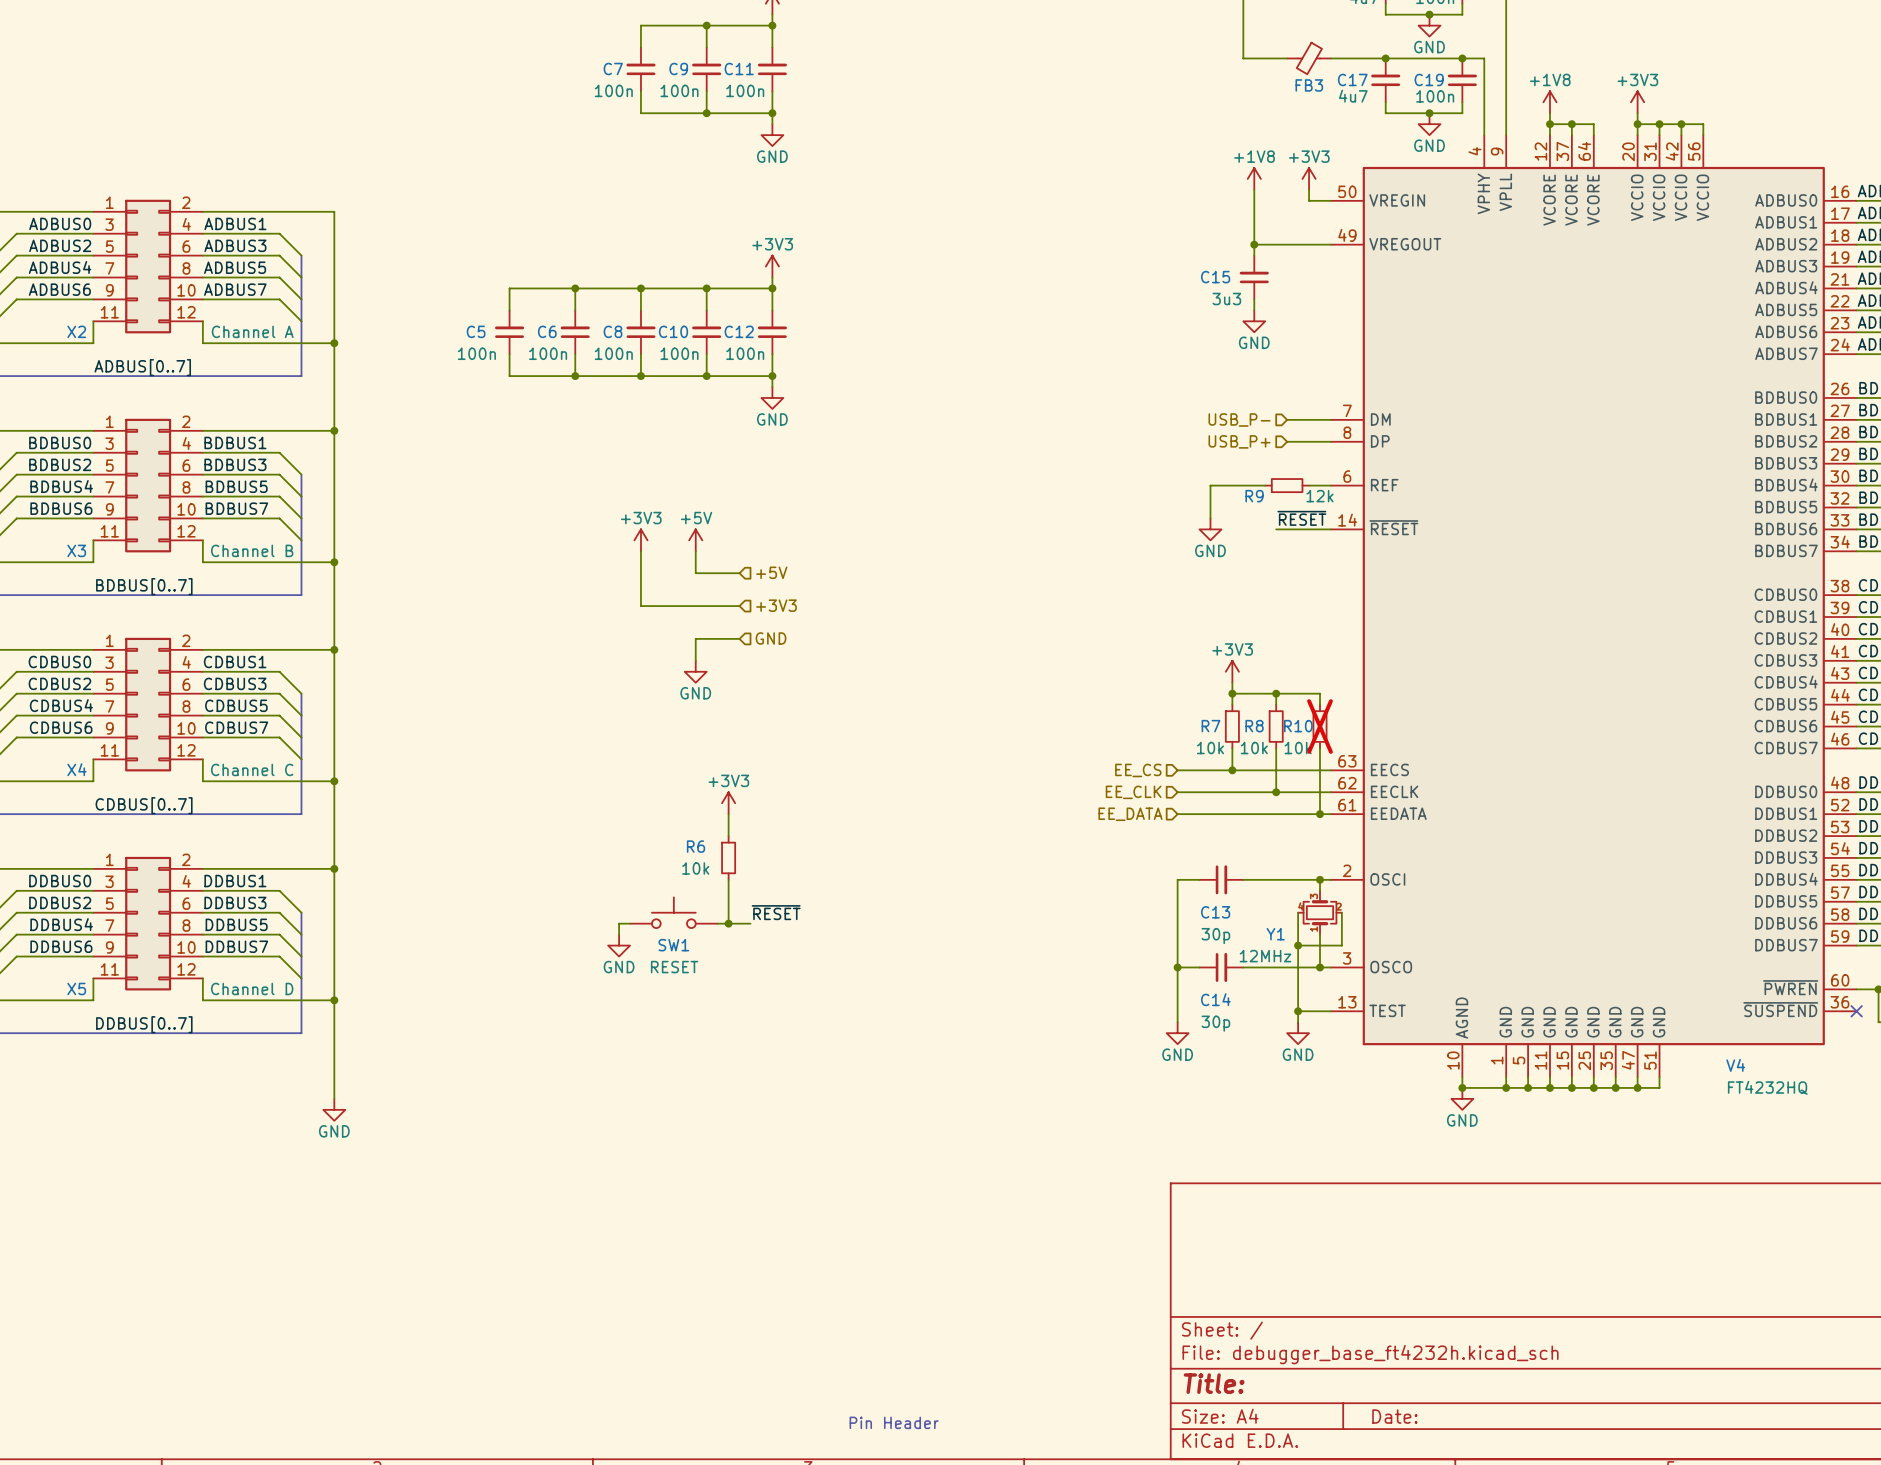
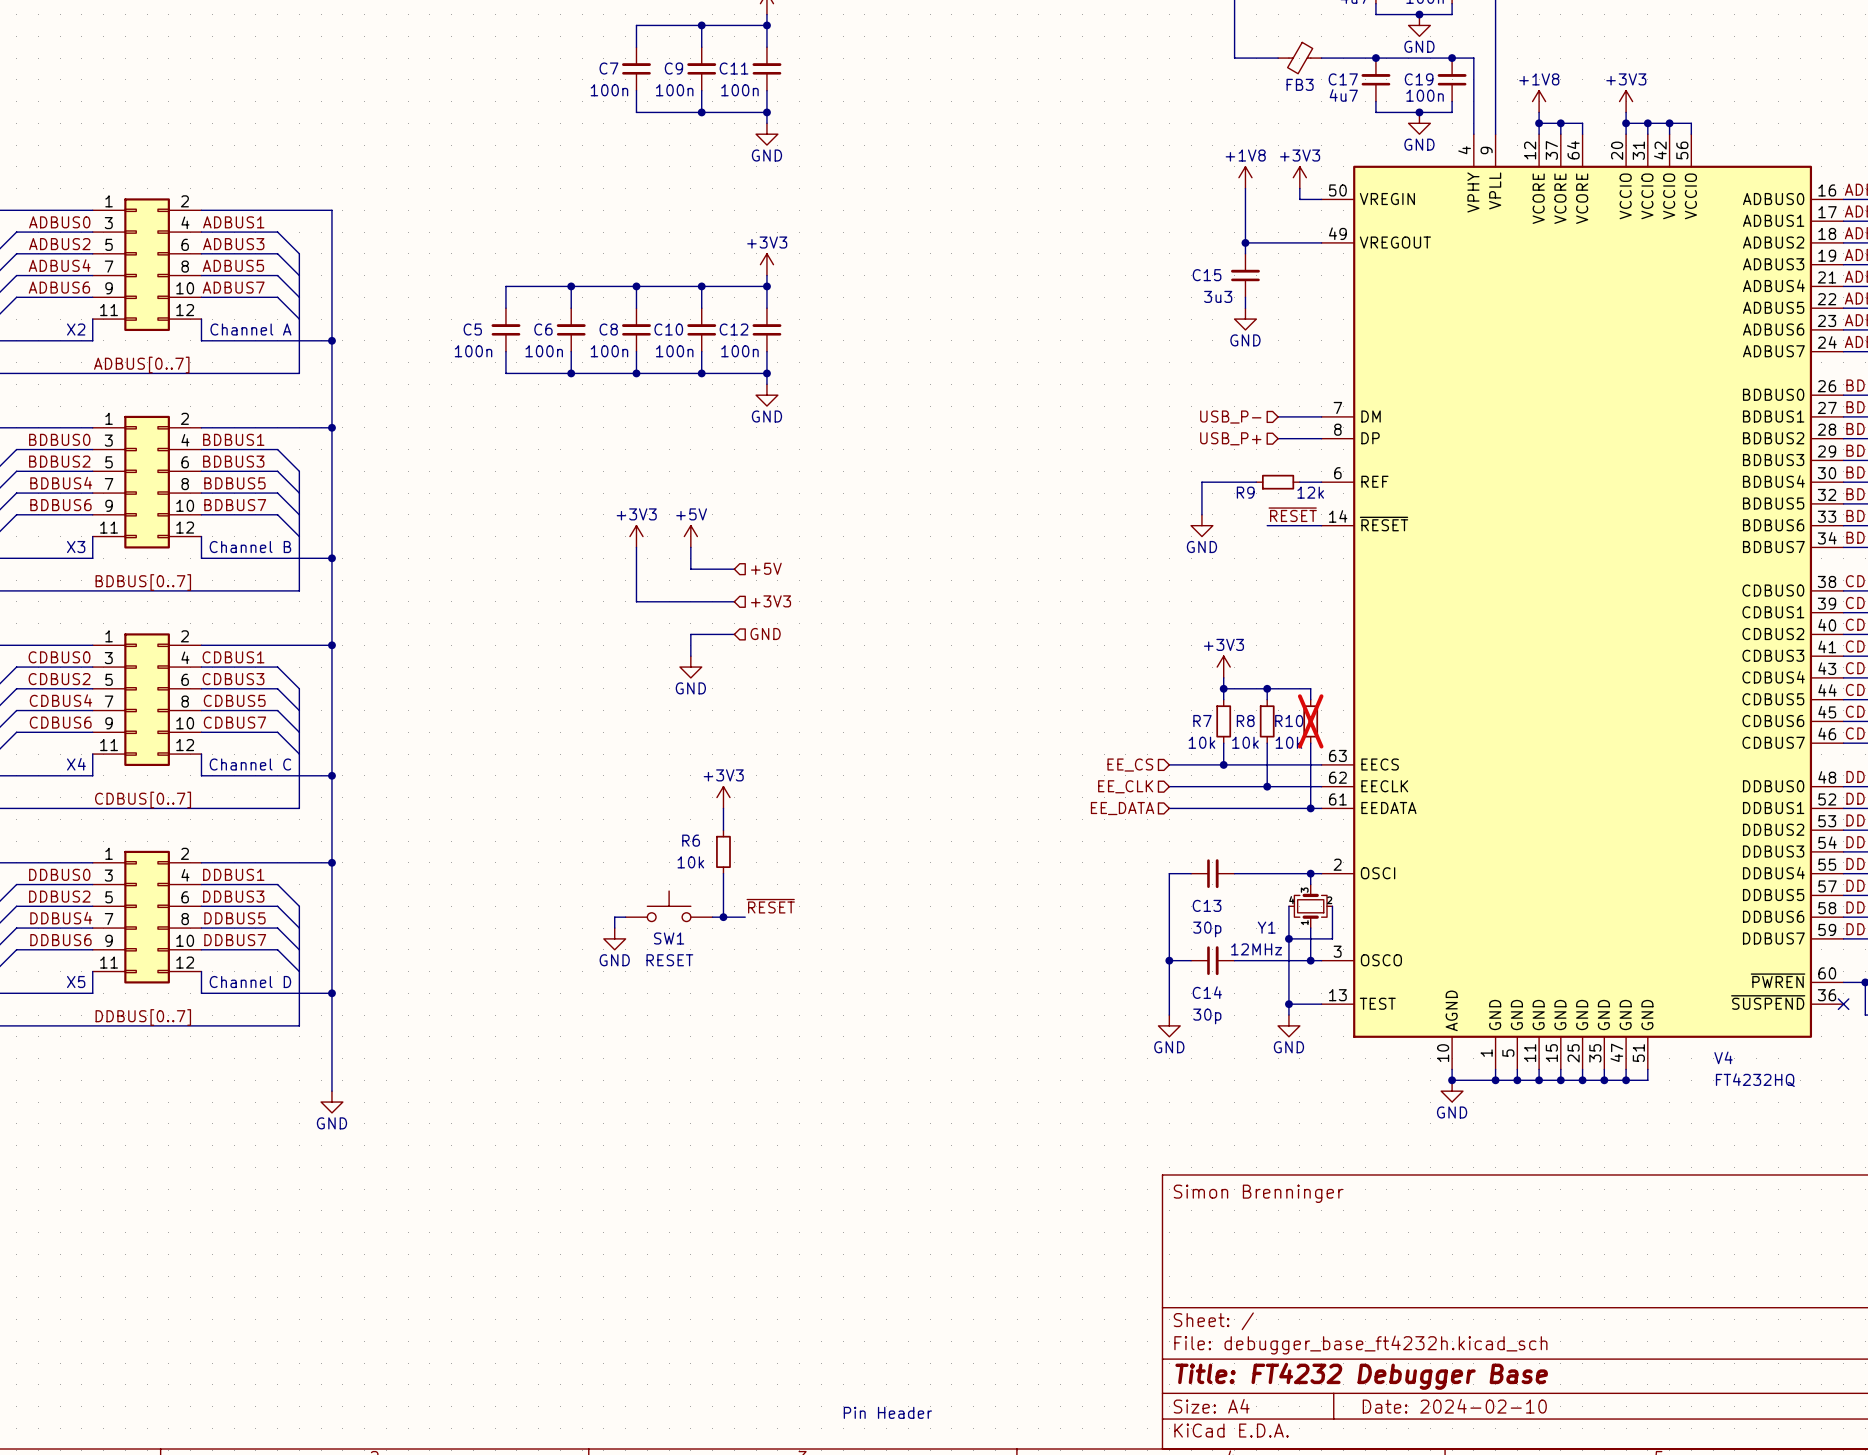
title block: none -> Simon Brenninger (1258, 1193)
title block: Title: (1214, 1383) -> Title: FT4232 Debugger Base (1361, 1376)
title block: Date: (1394, 1416) -> Date: 2024-02-10 (1454, 1406)

